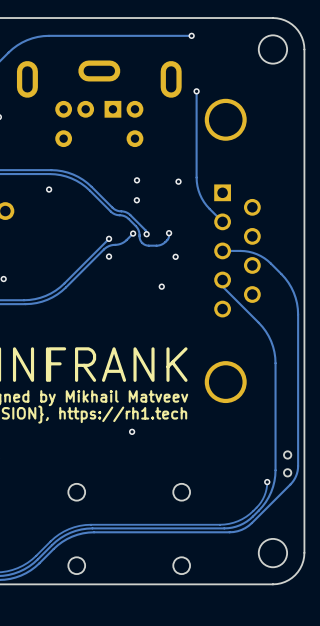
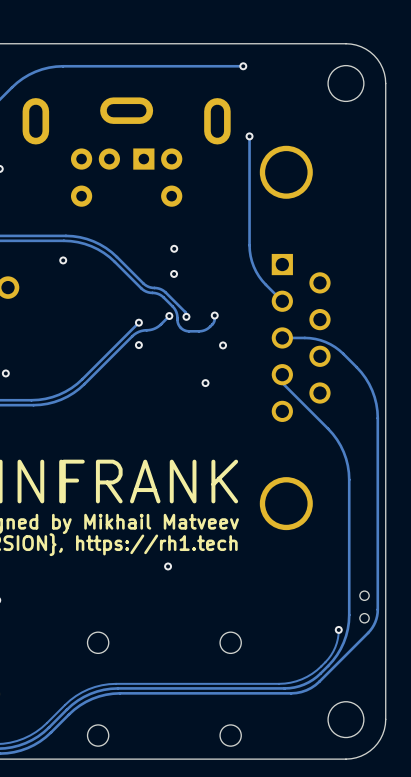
via: (178, 181) -> none

